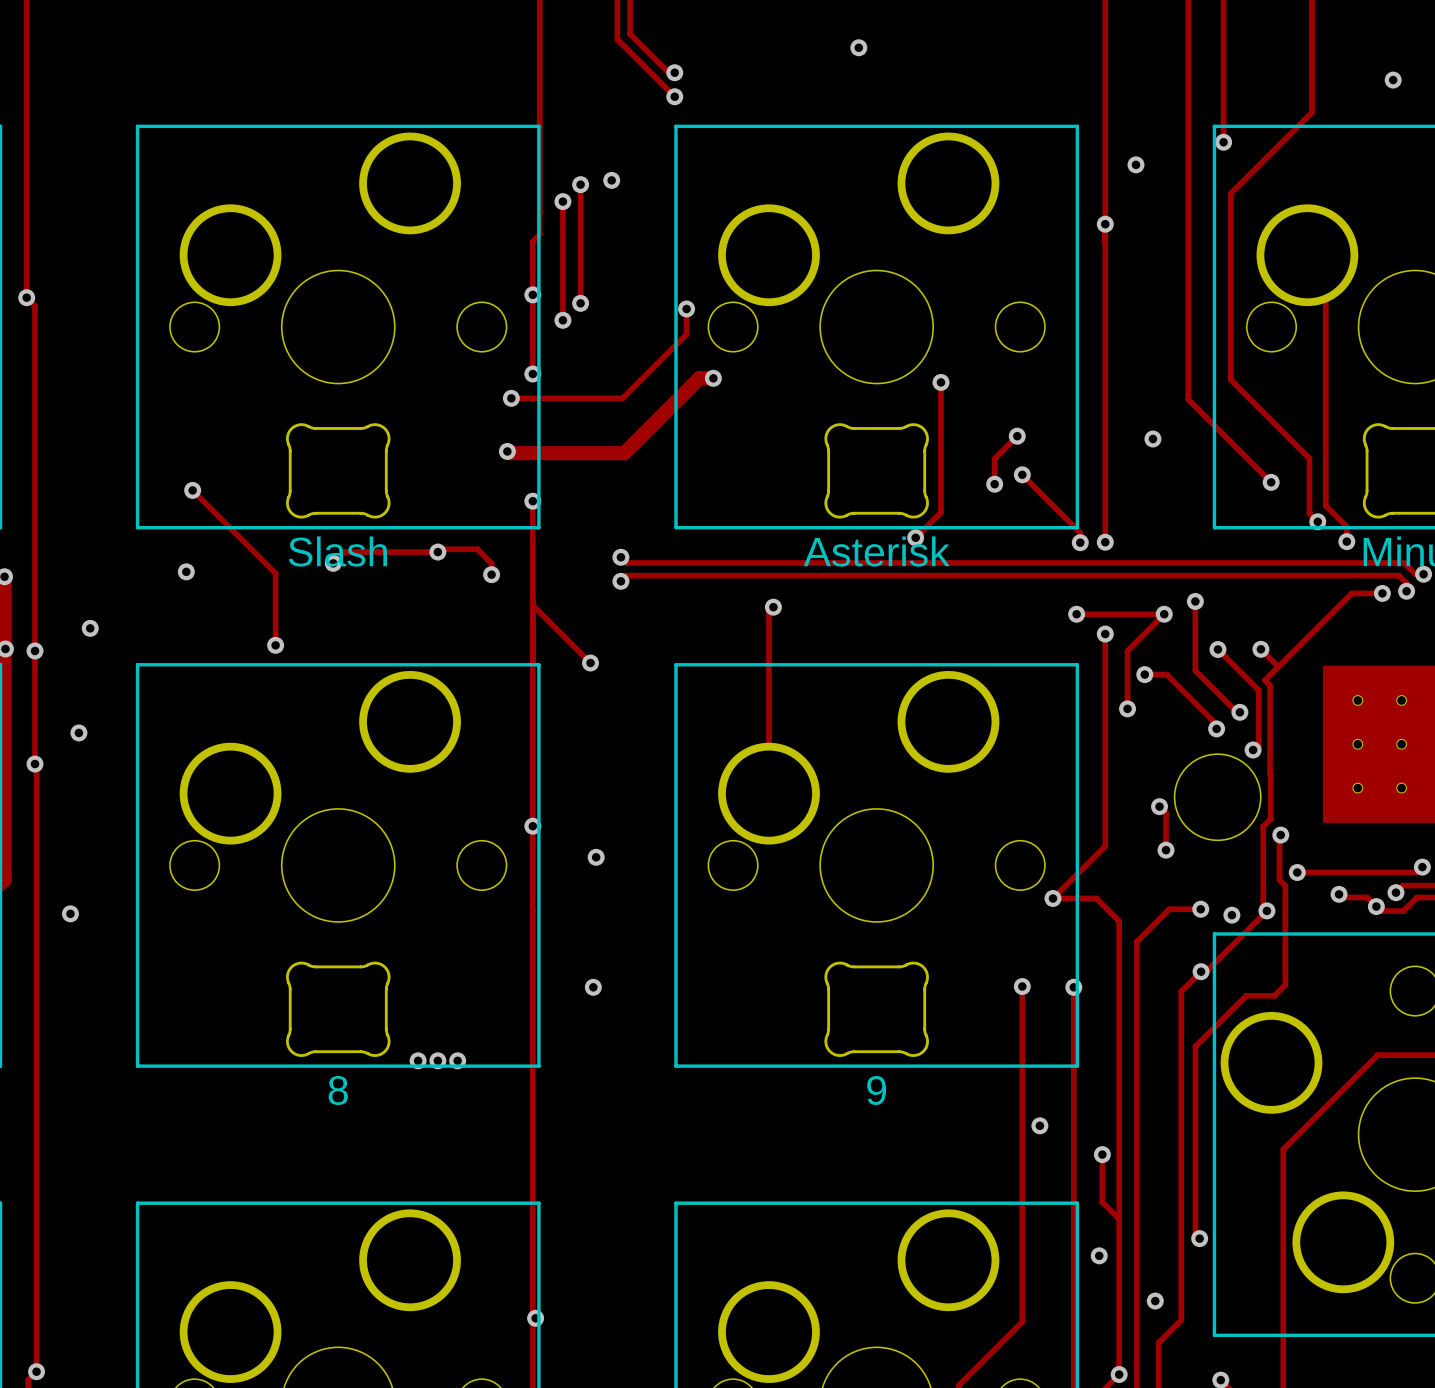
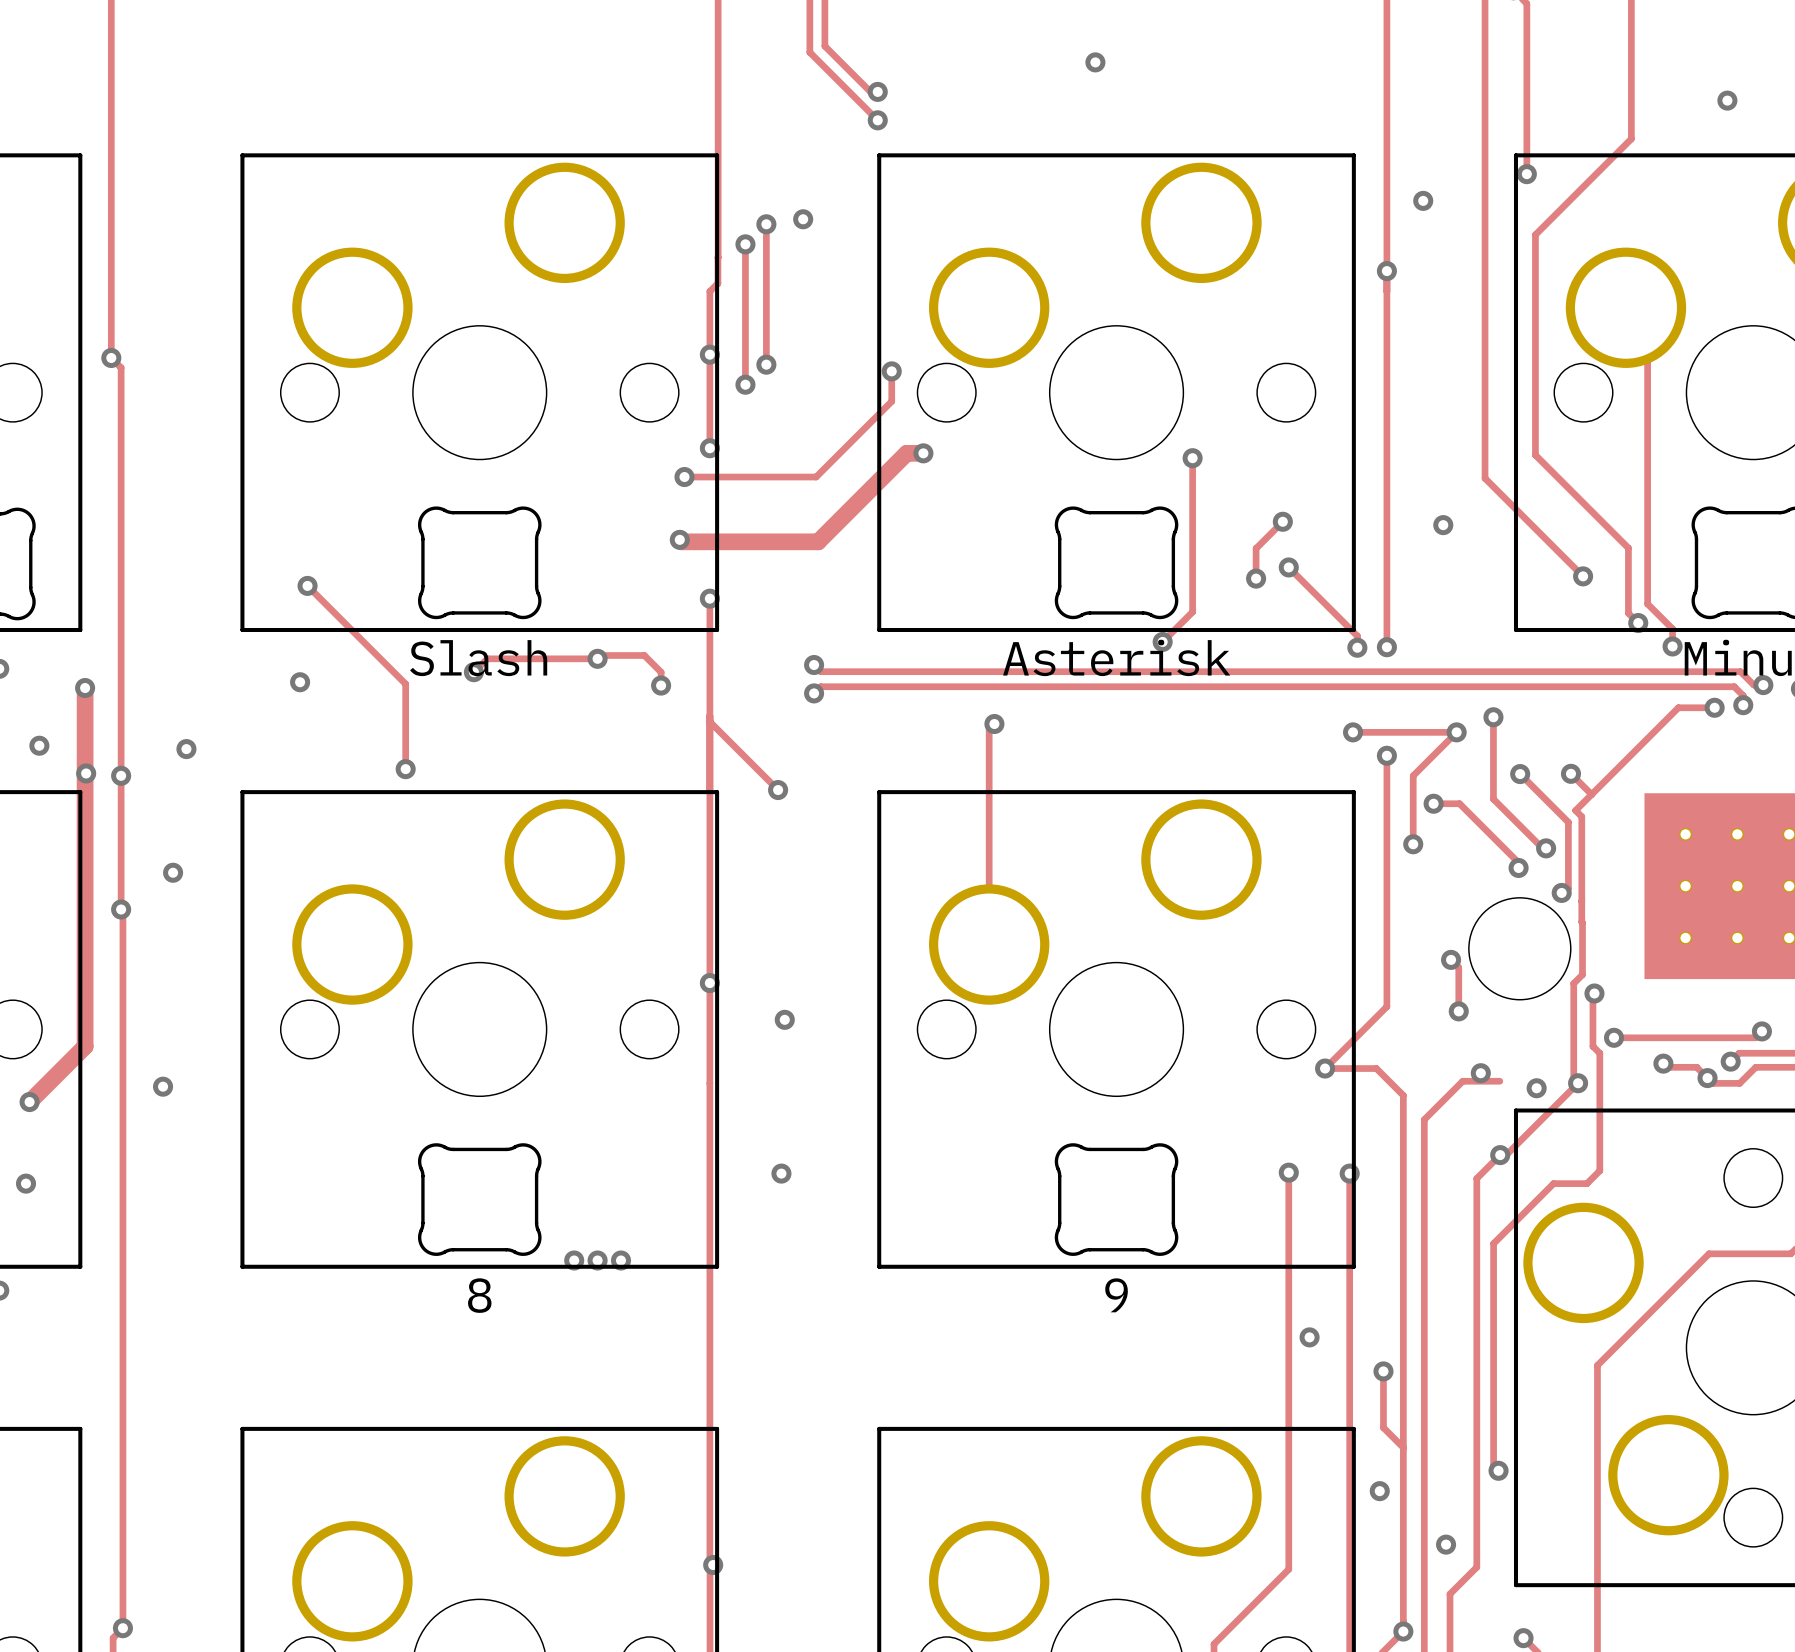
via position: (1200, 909) -> (1480, 1073)

